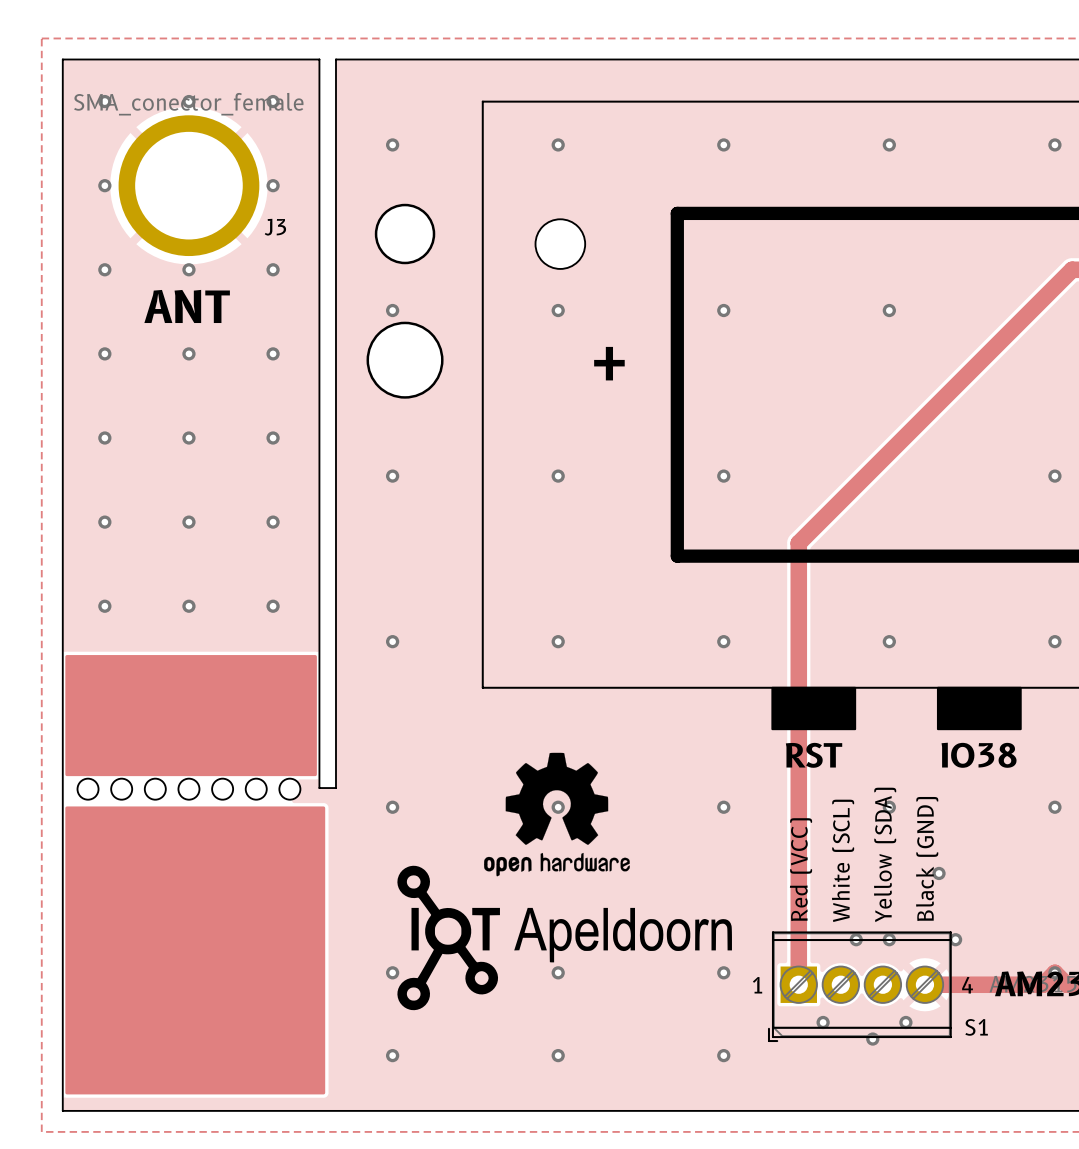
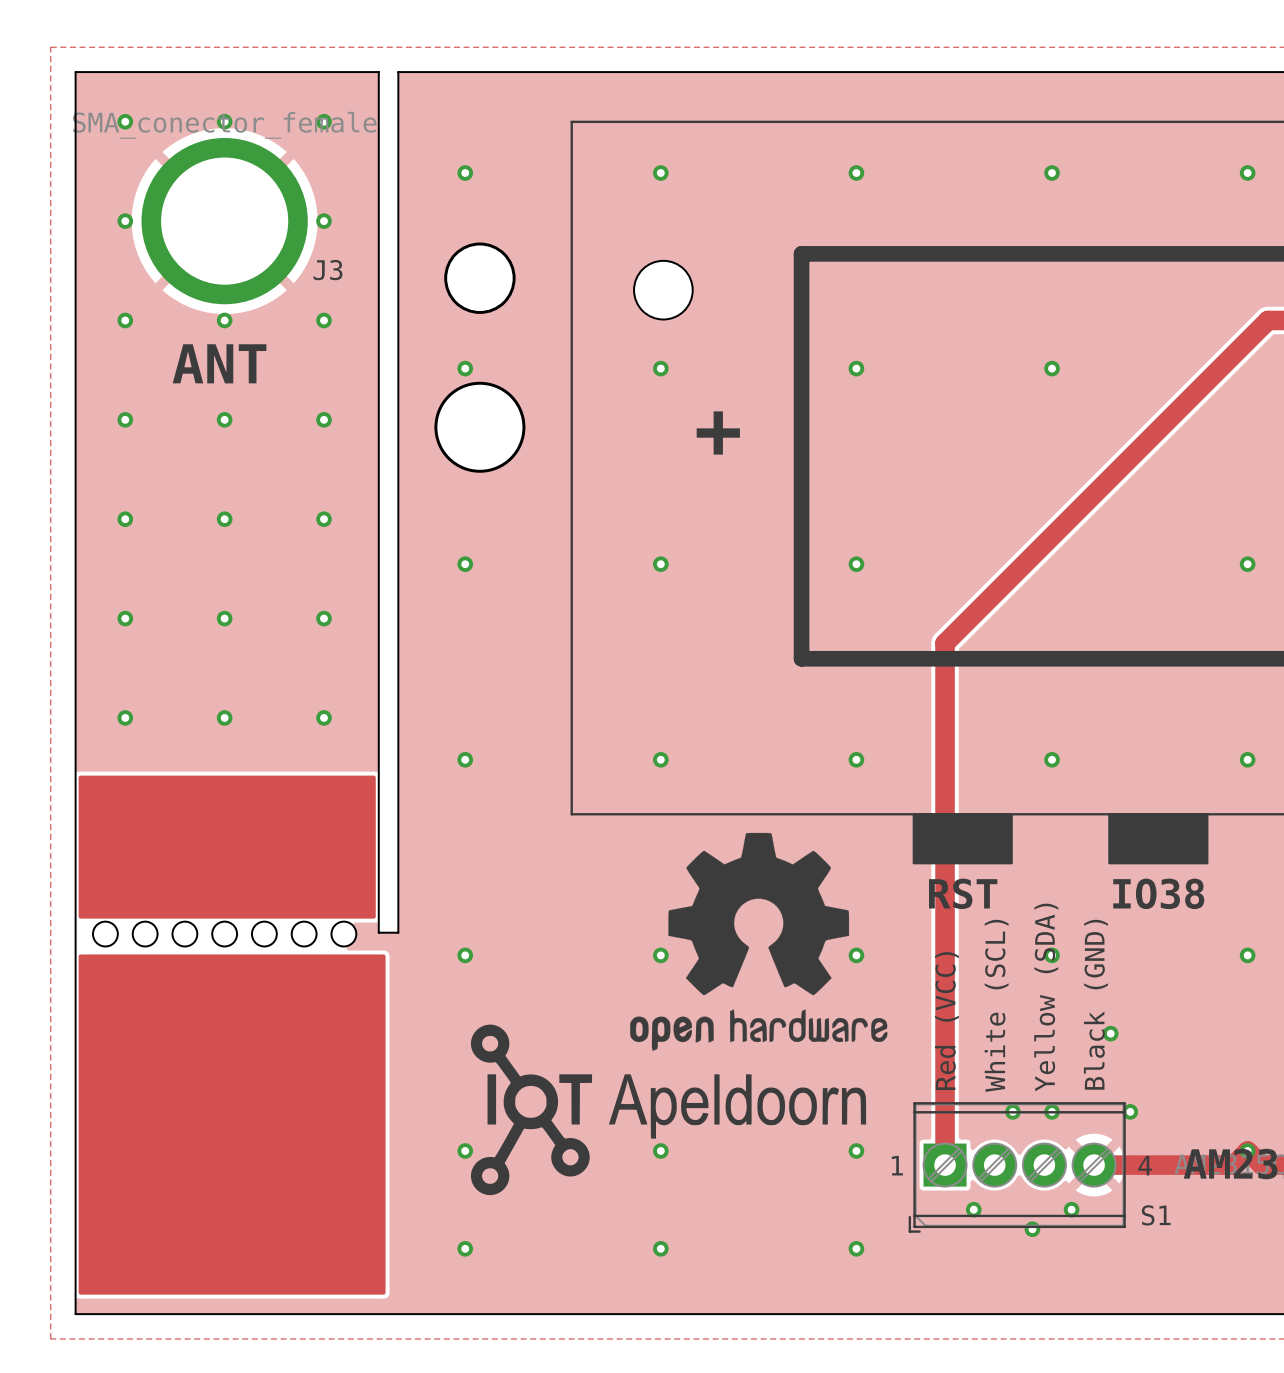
drawing: none -> [630, 832, 888, 1051]
drawing: [484, 752, 630, 877] -> none

